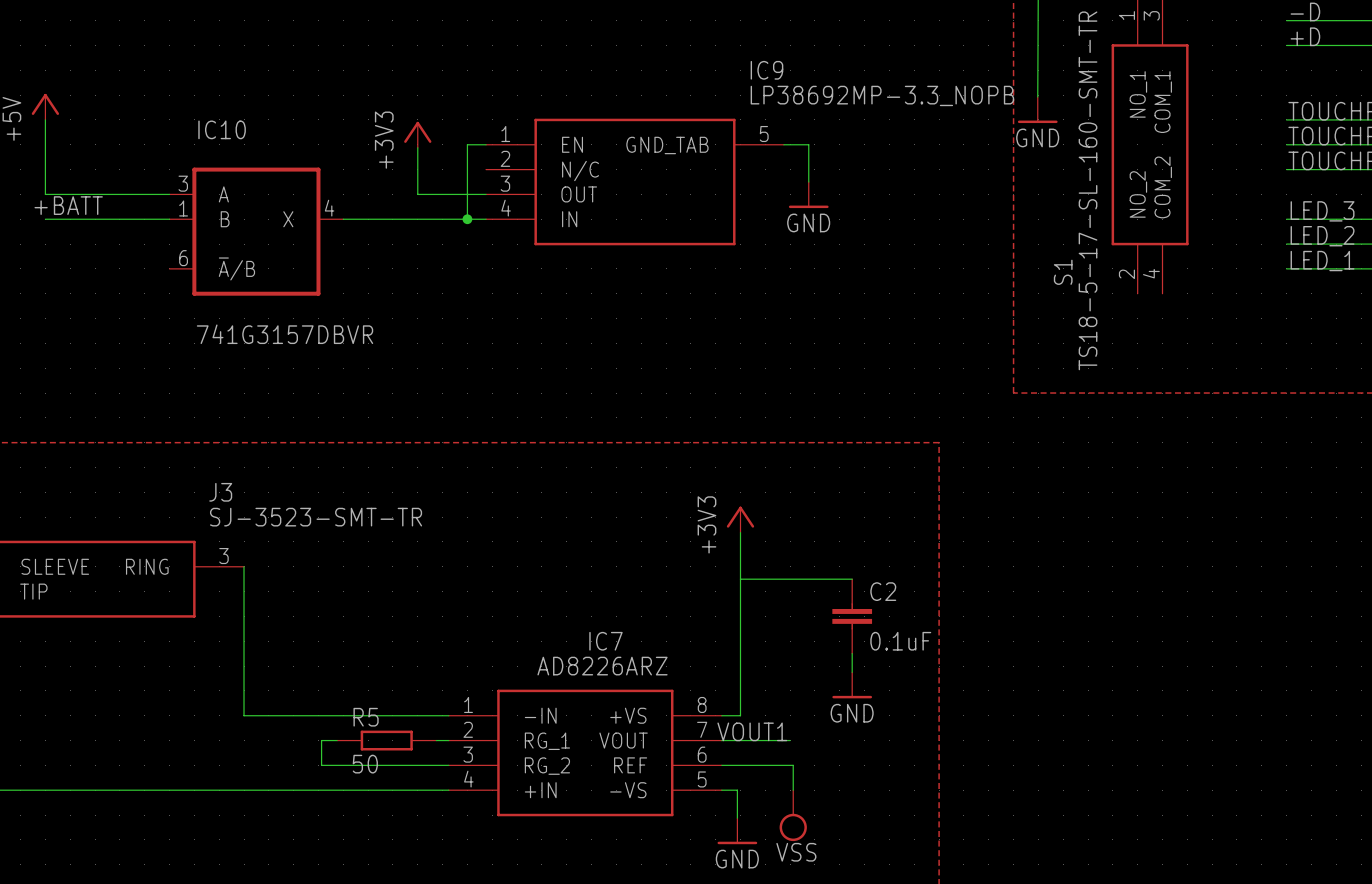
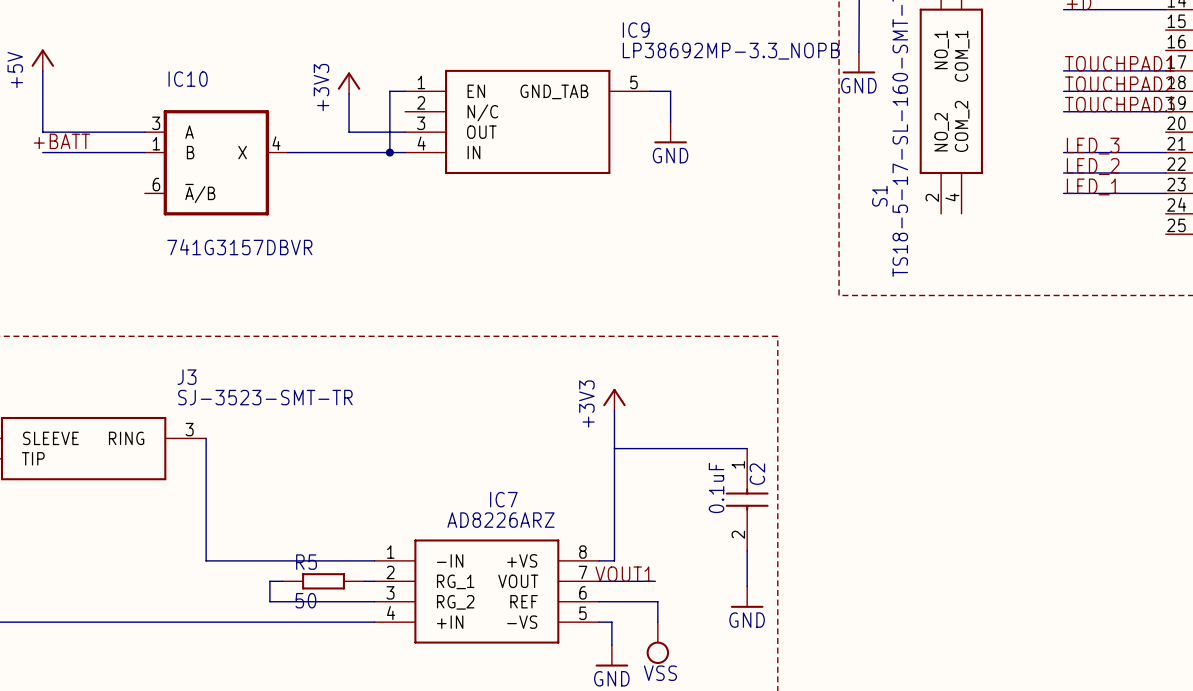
C2 symbol: [832, 579, 873, 654] -> [725, 448, 769, 551]
wire: none -> (706, 448) (747, 448)
C2 name position: C2 (883, 591) -> C2 (757, 474)
C2 value position: 0.1uF (900, 641) -> 0.1uF (716, 487)
wire: (852, 653) (852, 672) -> none
power symbol position: GND (852, 685) -> GND (747, 597)
wire: none -> (747, 550) (747, 586)

